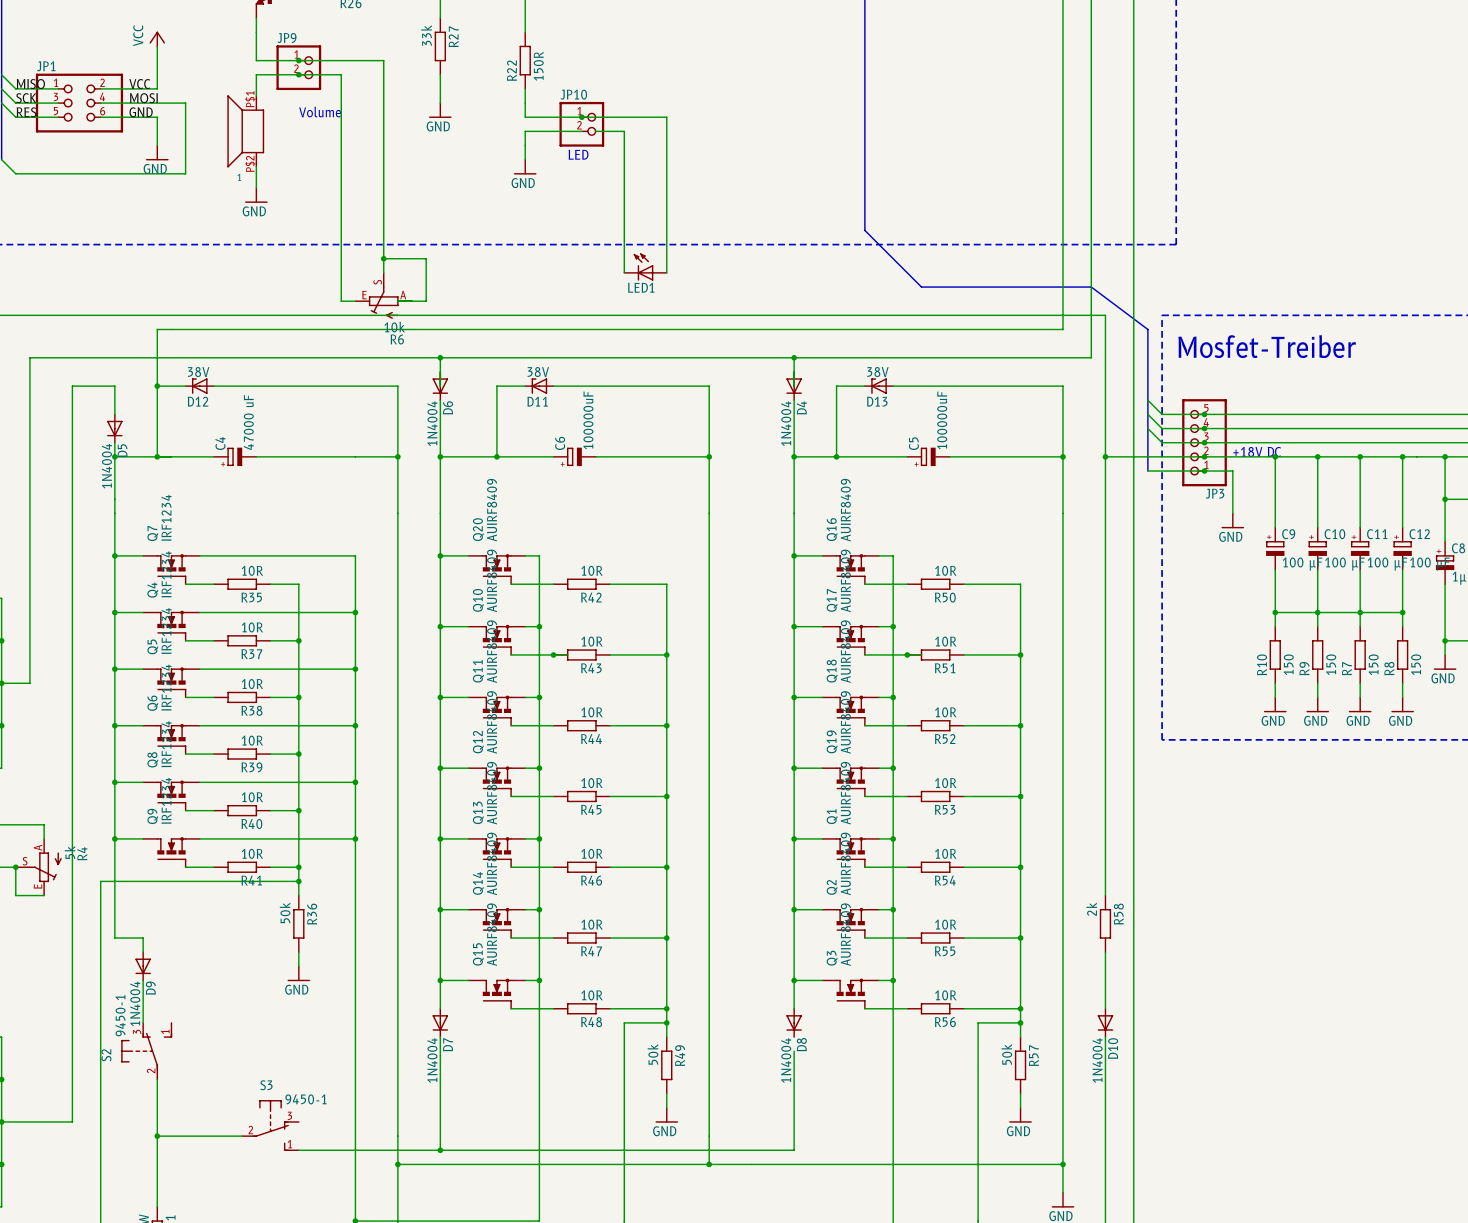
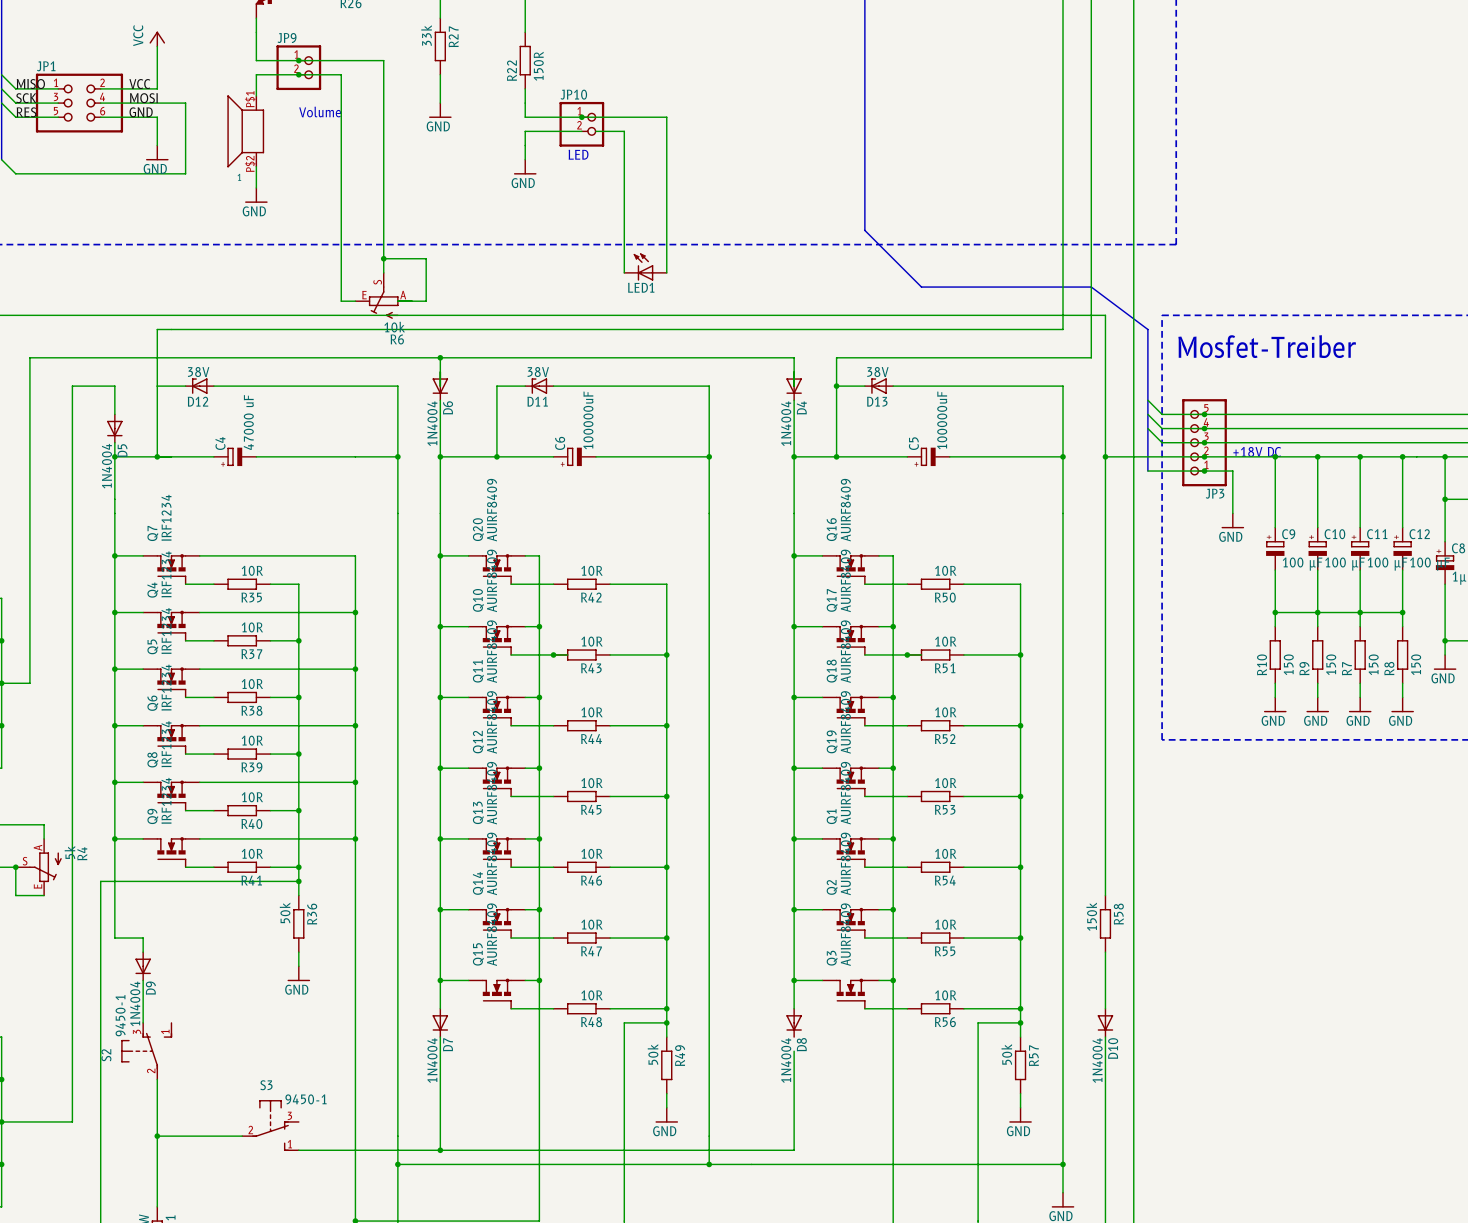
wire: (794, 357) (836, 357) -> (836, 386) (836, 357)
junction: (794, 357) -> none
junction: (157, 386) -> none
junction: none -> (836, 386)
R58 value: 2k (1091, 909) -> 150k (1091, 916)

